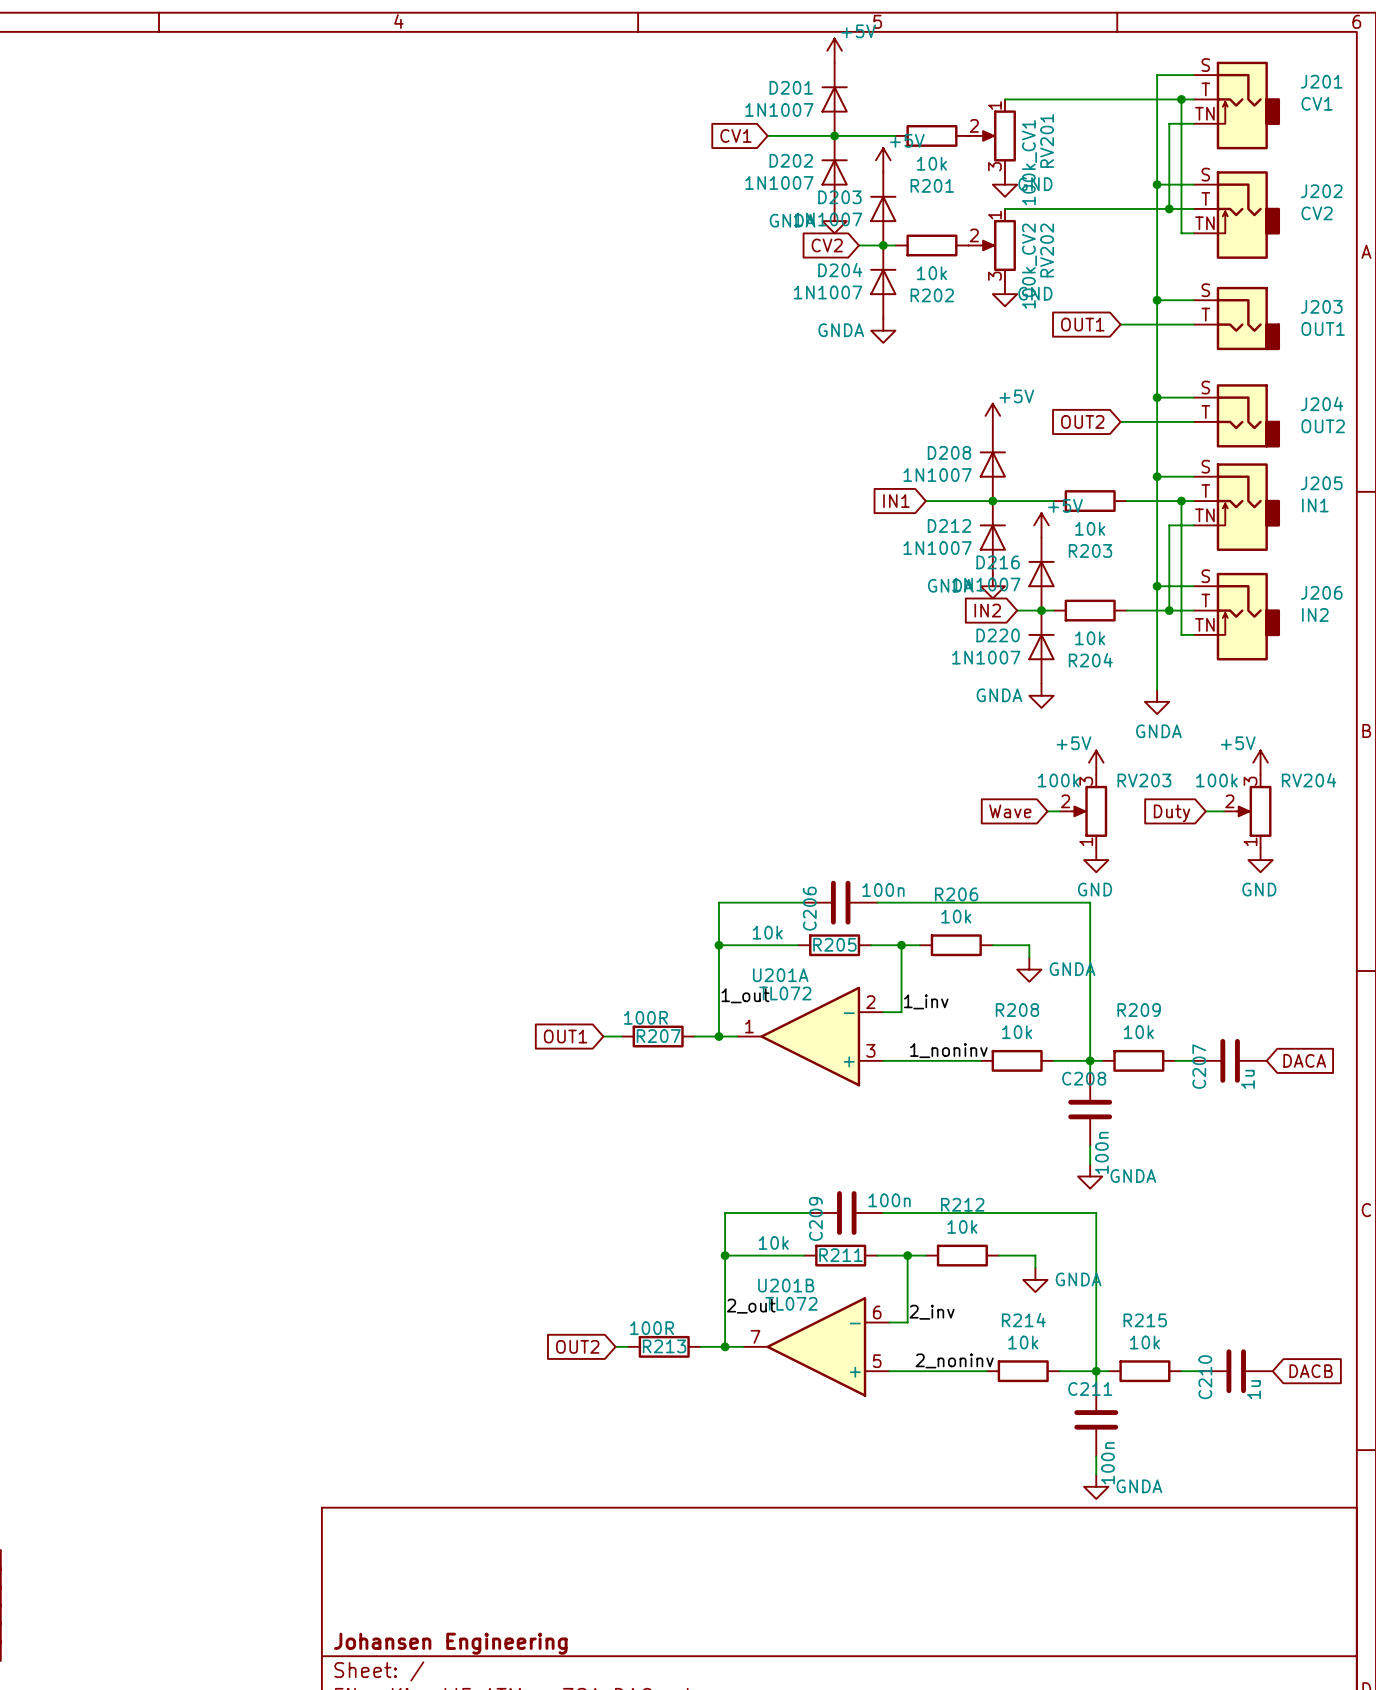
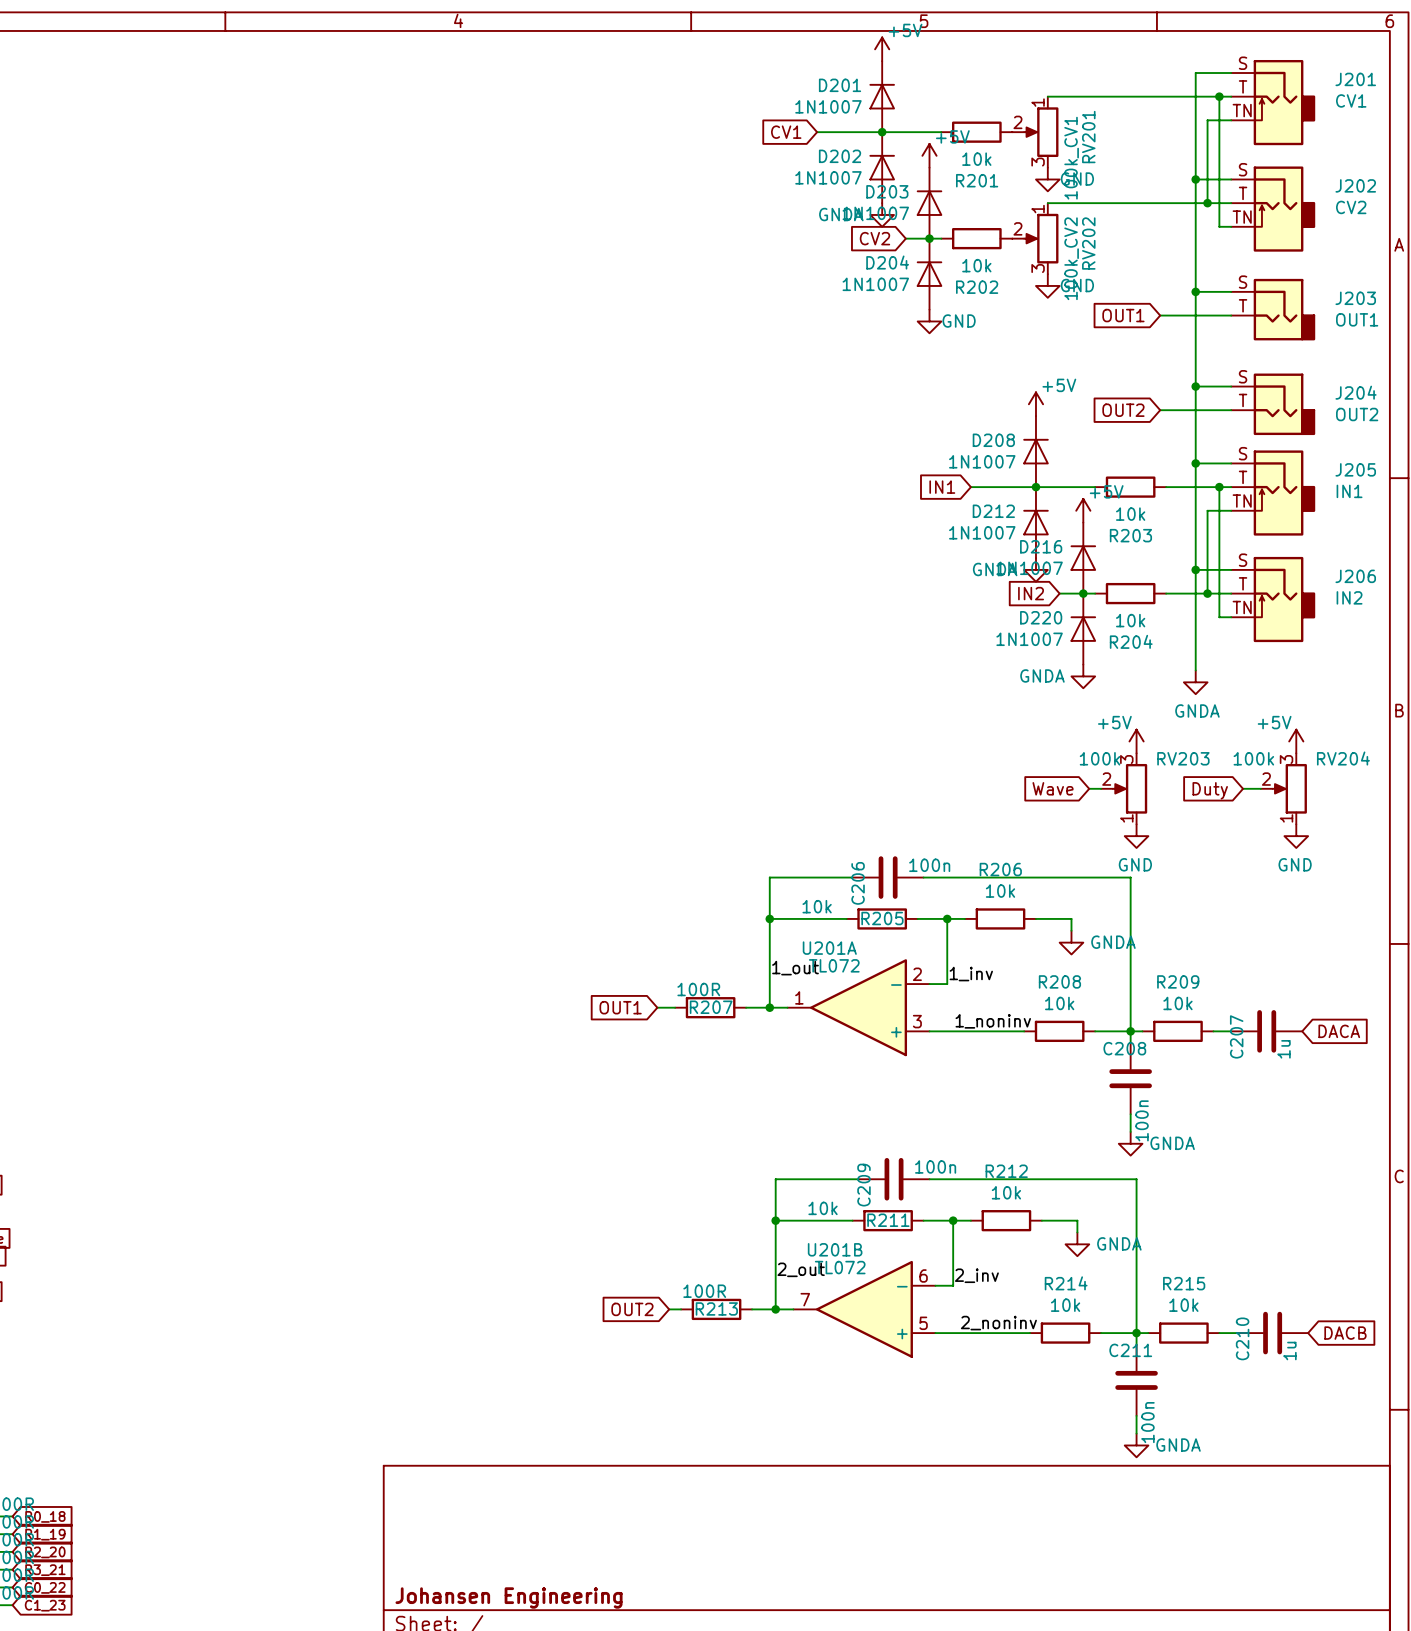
power symbol: GNDA (883, 330) -> GND (929, 321)

